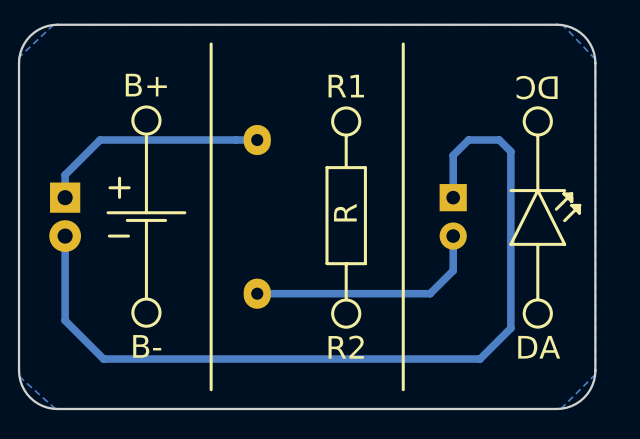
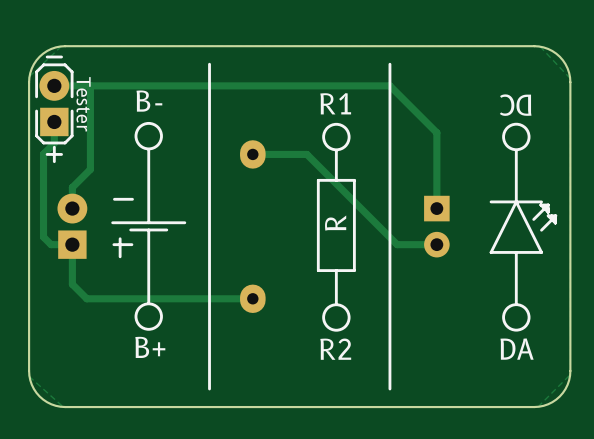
line: none -> (61, 57) (47, 57)
text position: B+ (146, 85) -> B+ (150, 347)
part: none -> Tester (54, 103)
track: none -> (54, 121) (54, 143) (43, 154) (43, 237) (51, 244) (72, 244)
line: none -> (54, 147) (54, 161)
line: none -> (61, 154) (47, 154)
track: (257, 140) (100, 140) (65, 174) -> (90, 85) (90, 169) (72, 187)
track: (453, 155) (468, 140) (499, 140) (510, 151) (510, 328) (480, 359) (103, 359) (65, 320) (65, 278) -> (436, 168) (436, 132) (389, 85) (54, 85)
line: (119, 178) (119, 197) -> (120, 238) (120, 256)
part rotation: 0° (65, 217) -> 180° (72, 226)
track: (453, 236) (453, 270) (430, 293) (257, 293) -> (436, 244) (397, 244) (306, 154) (252, 154)
track: none -> (72, 284) (86, 298) (252, 298)
text position: B- (147, 346) -> B- (149, 101)

